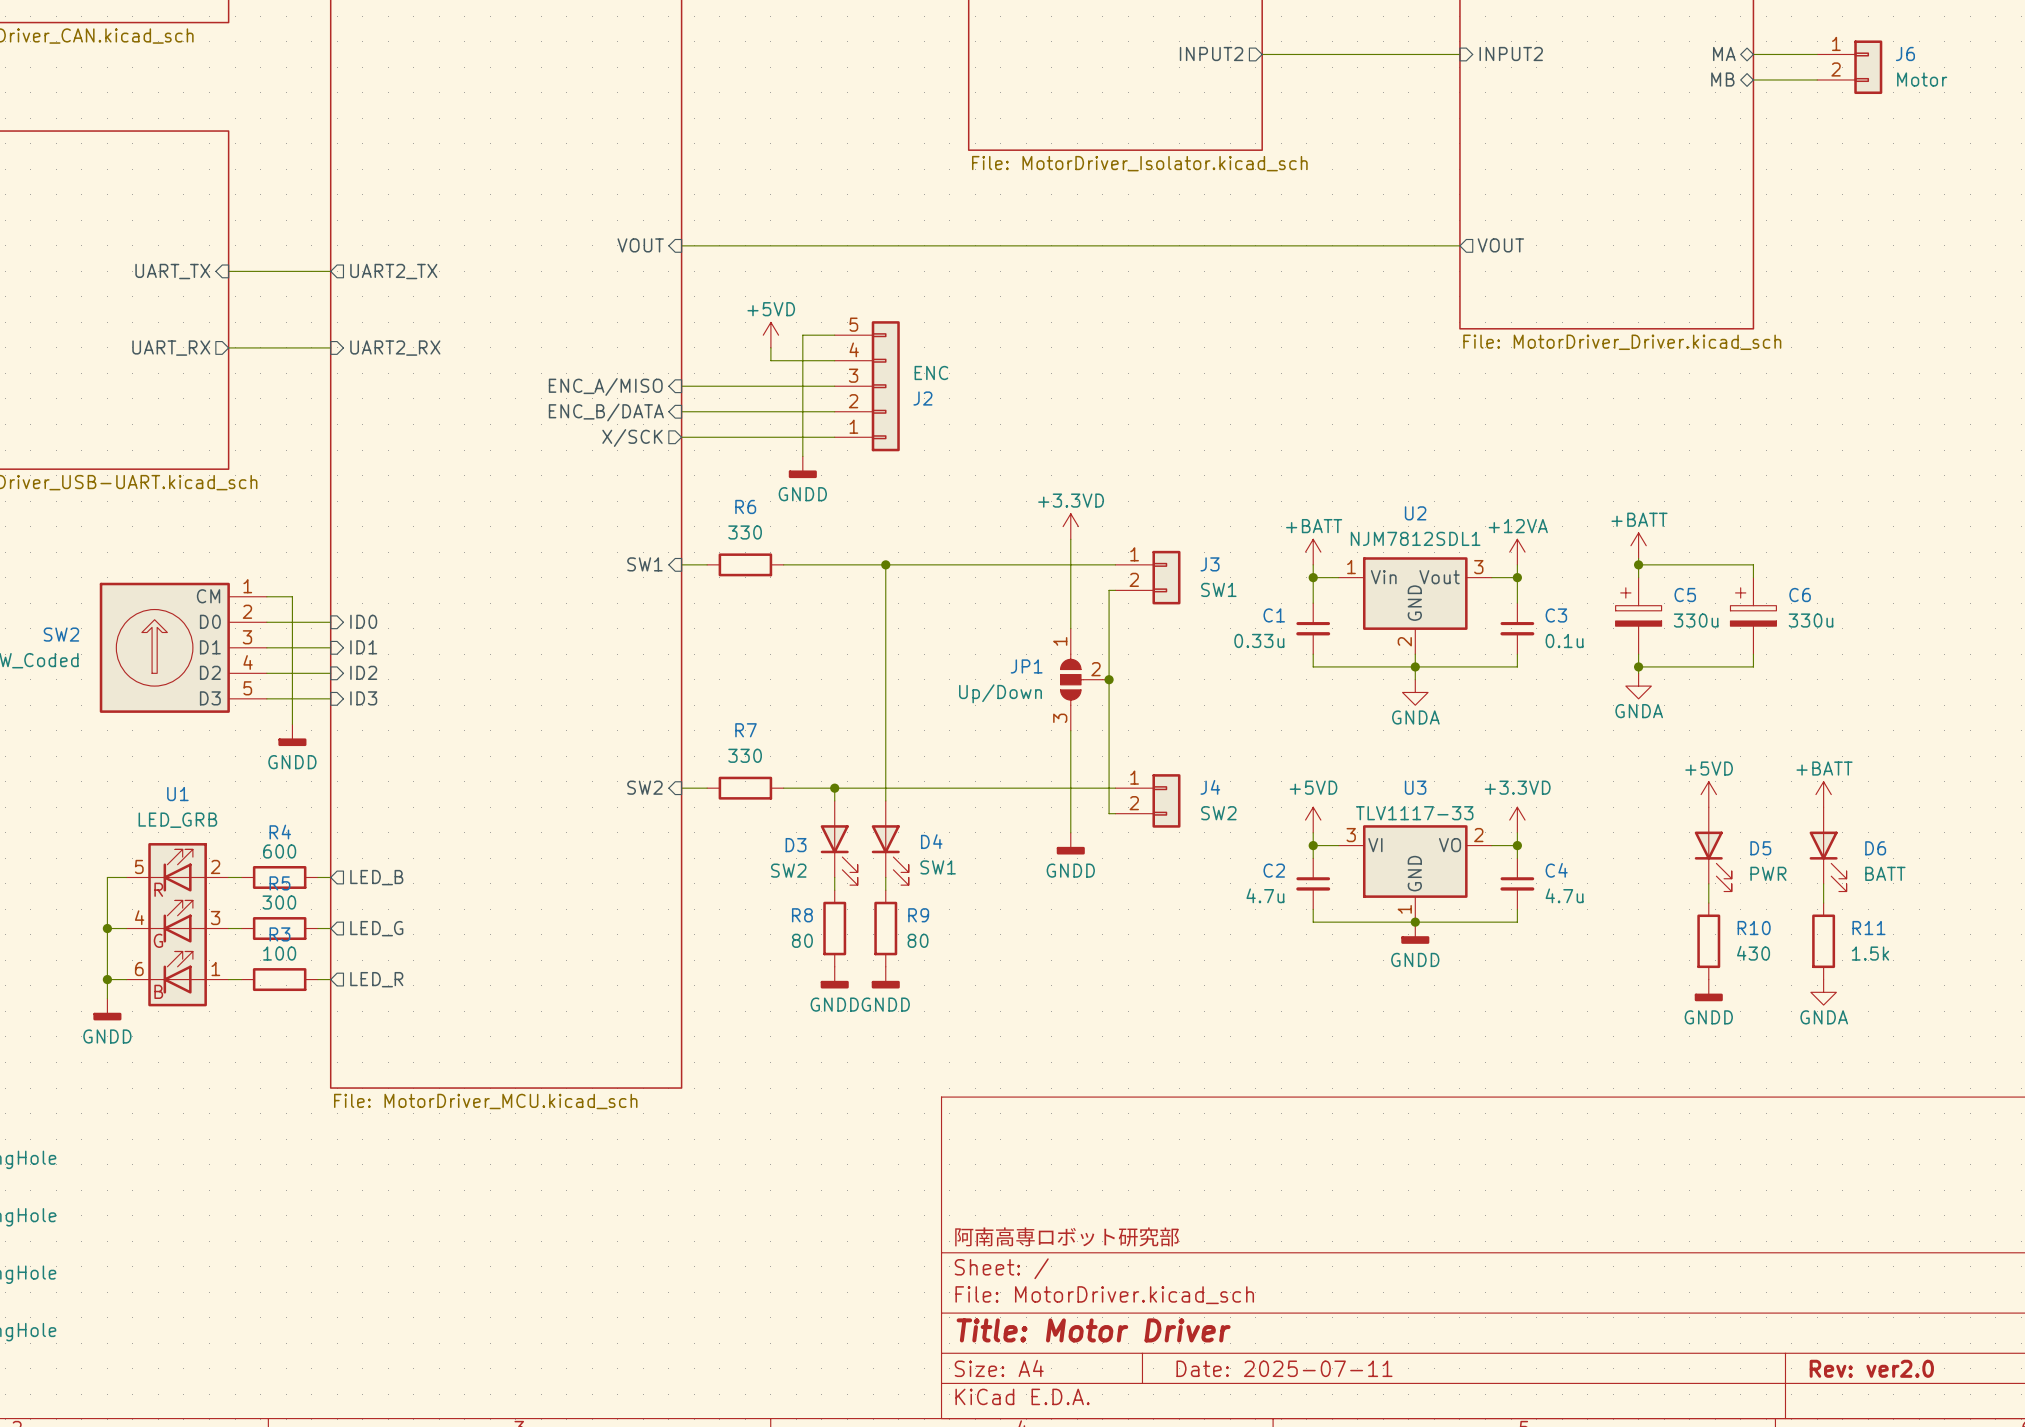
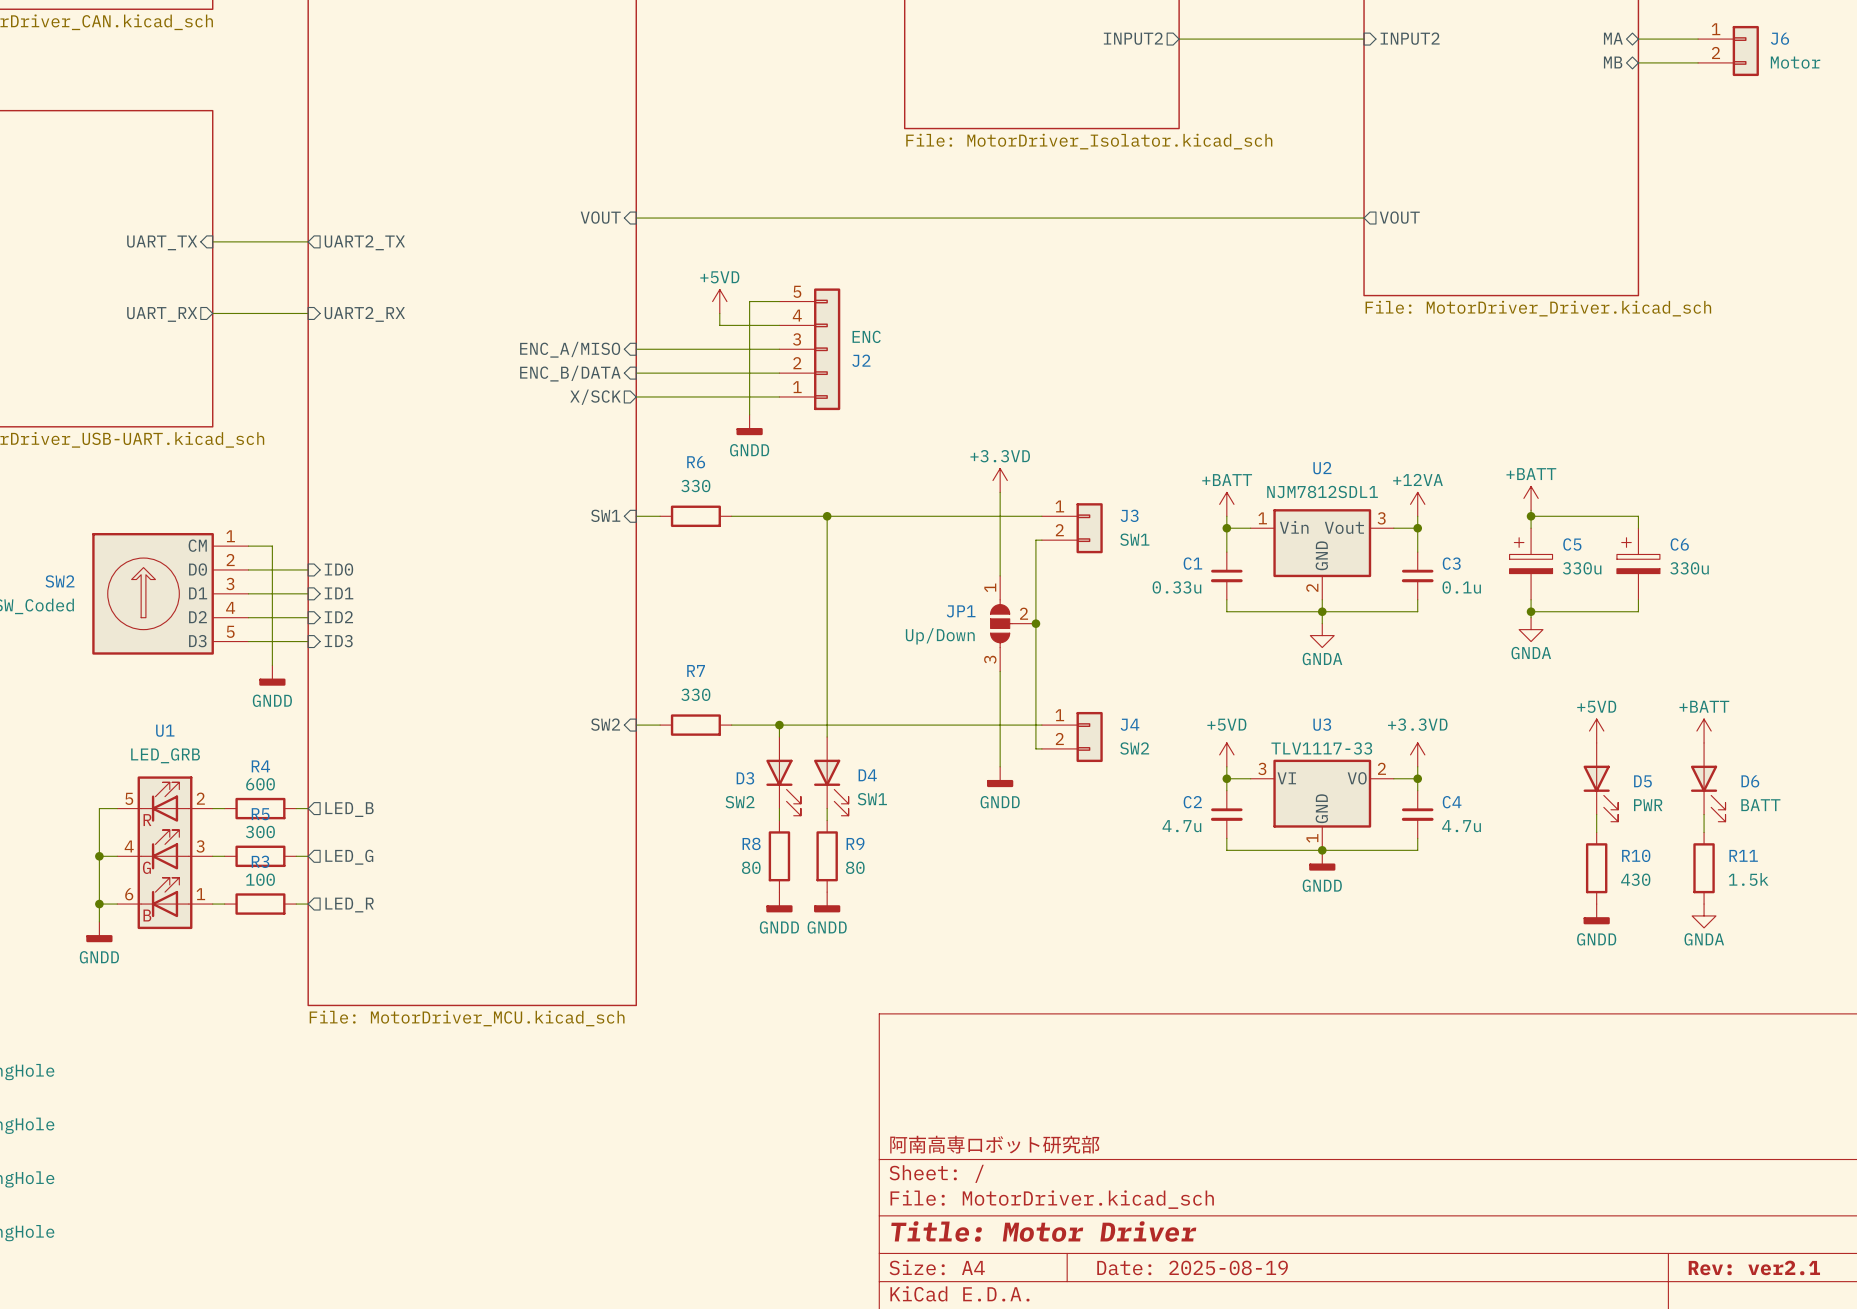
title block: Date: 2025-07-11 (1284, 1368) -> Date: 2025-08-19 (1192, 1267)
title block: Rev: ver2.0 (1871, 1368) -> Rev: ver2.1 (1754, 1267)

